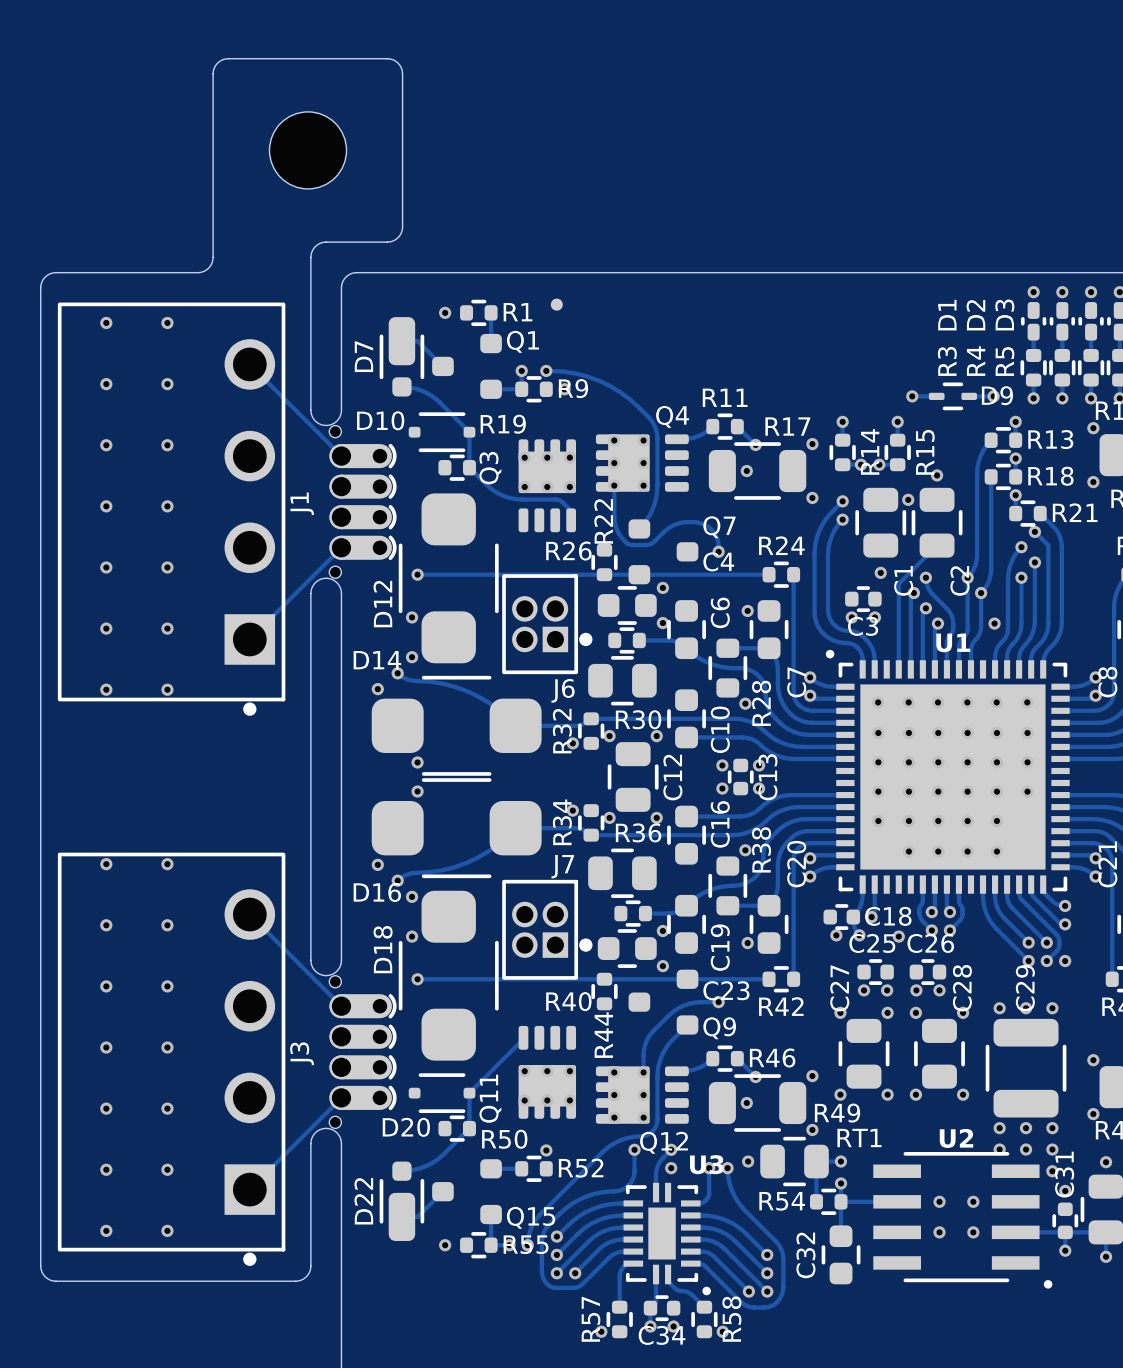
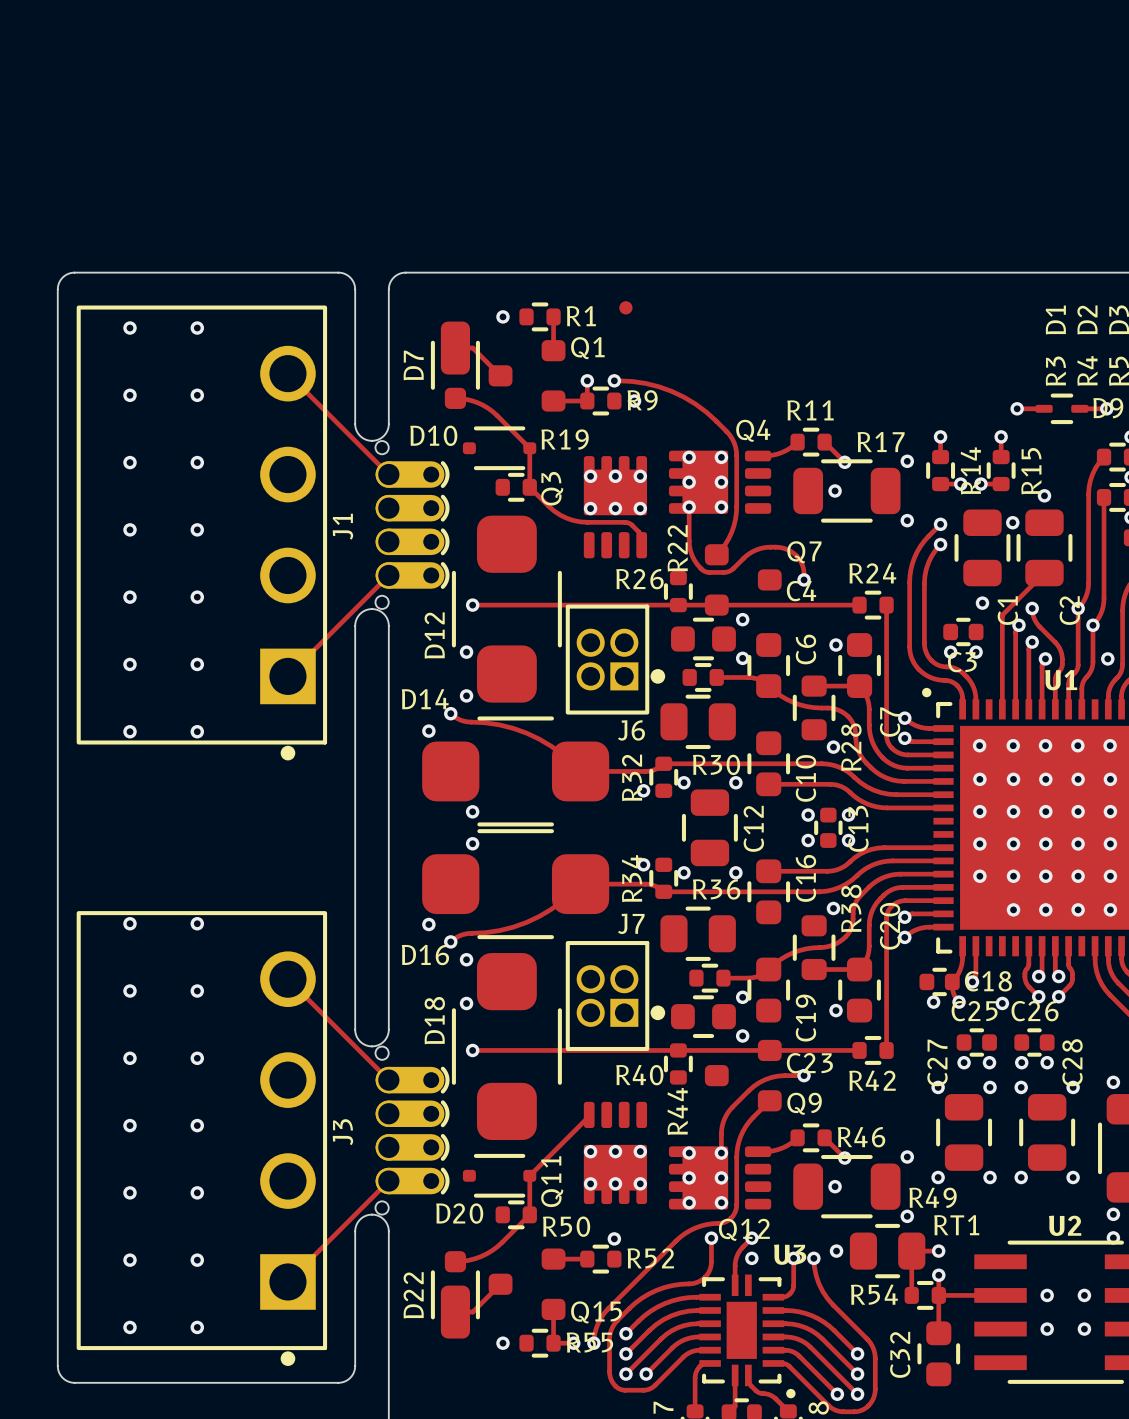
part: (308, 150) -> none
board edge: (197, 272) (208, 268) (212, 259) (213, 74) (217, 63) (228, 58) (392, 59) (399, 64) (402, 74) (401, 231) (396, 238) (388, 242) (326, 242) (318, 244) (313, 249) (310, 255) (310, 287) -> (230, 272) (340, 272) (350, 277) (355, 289)

